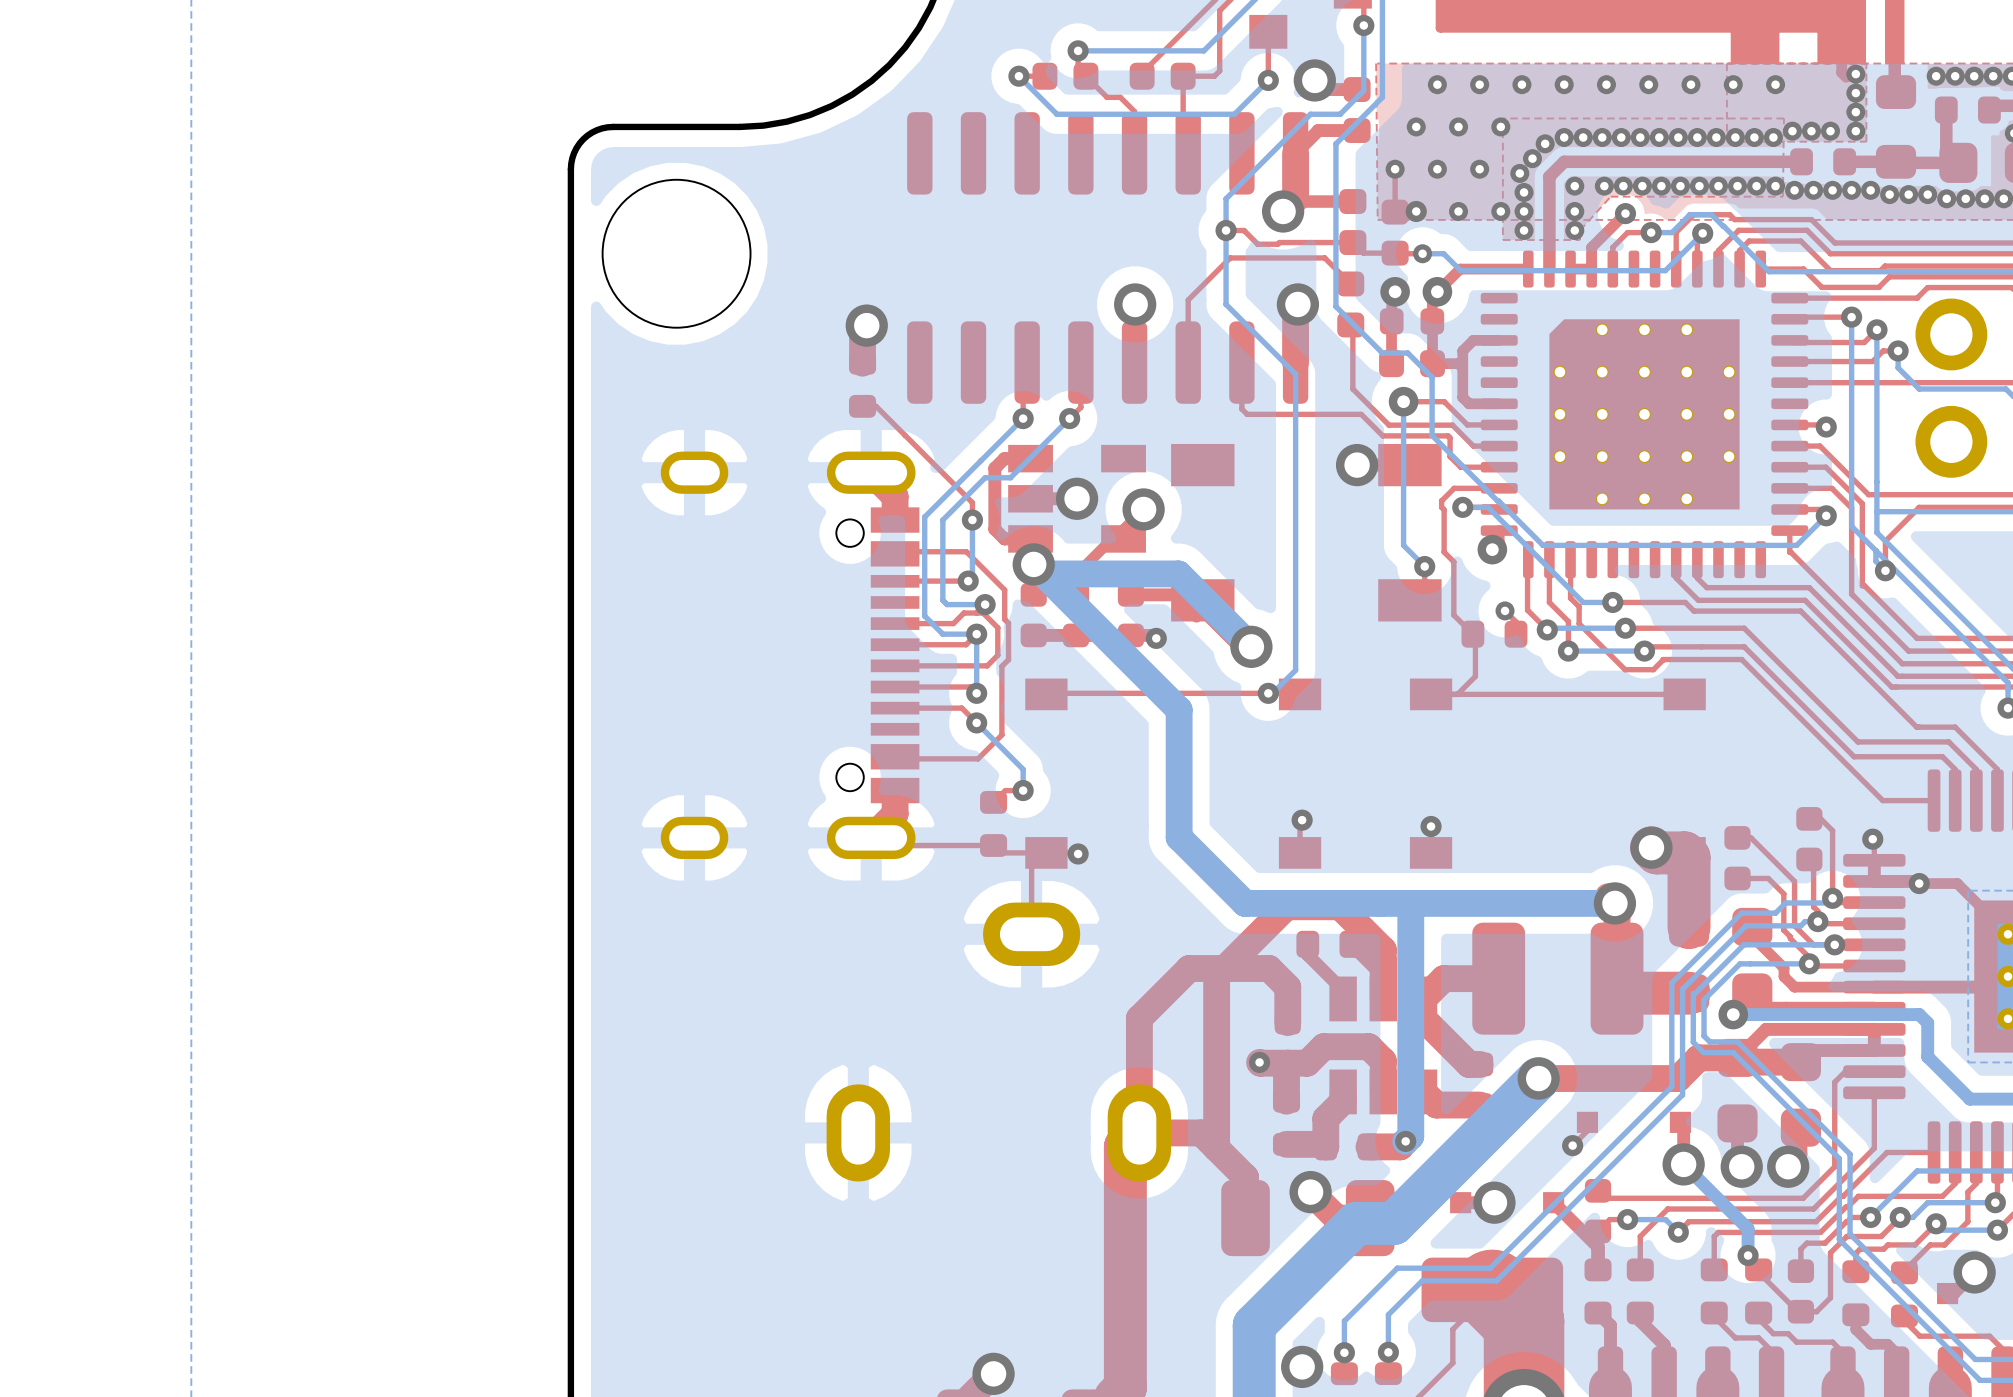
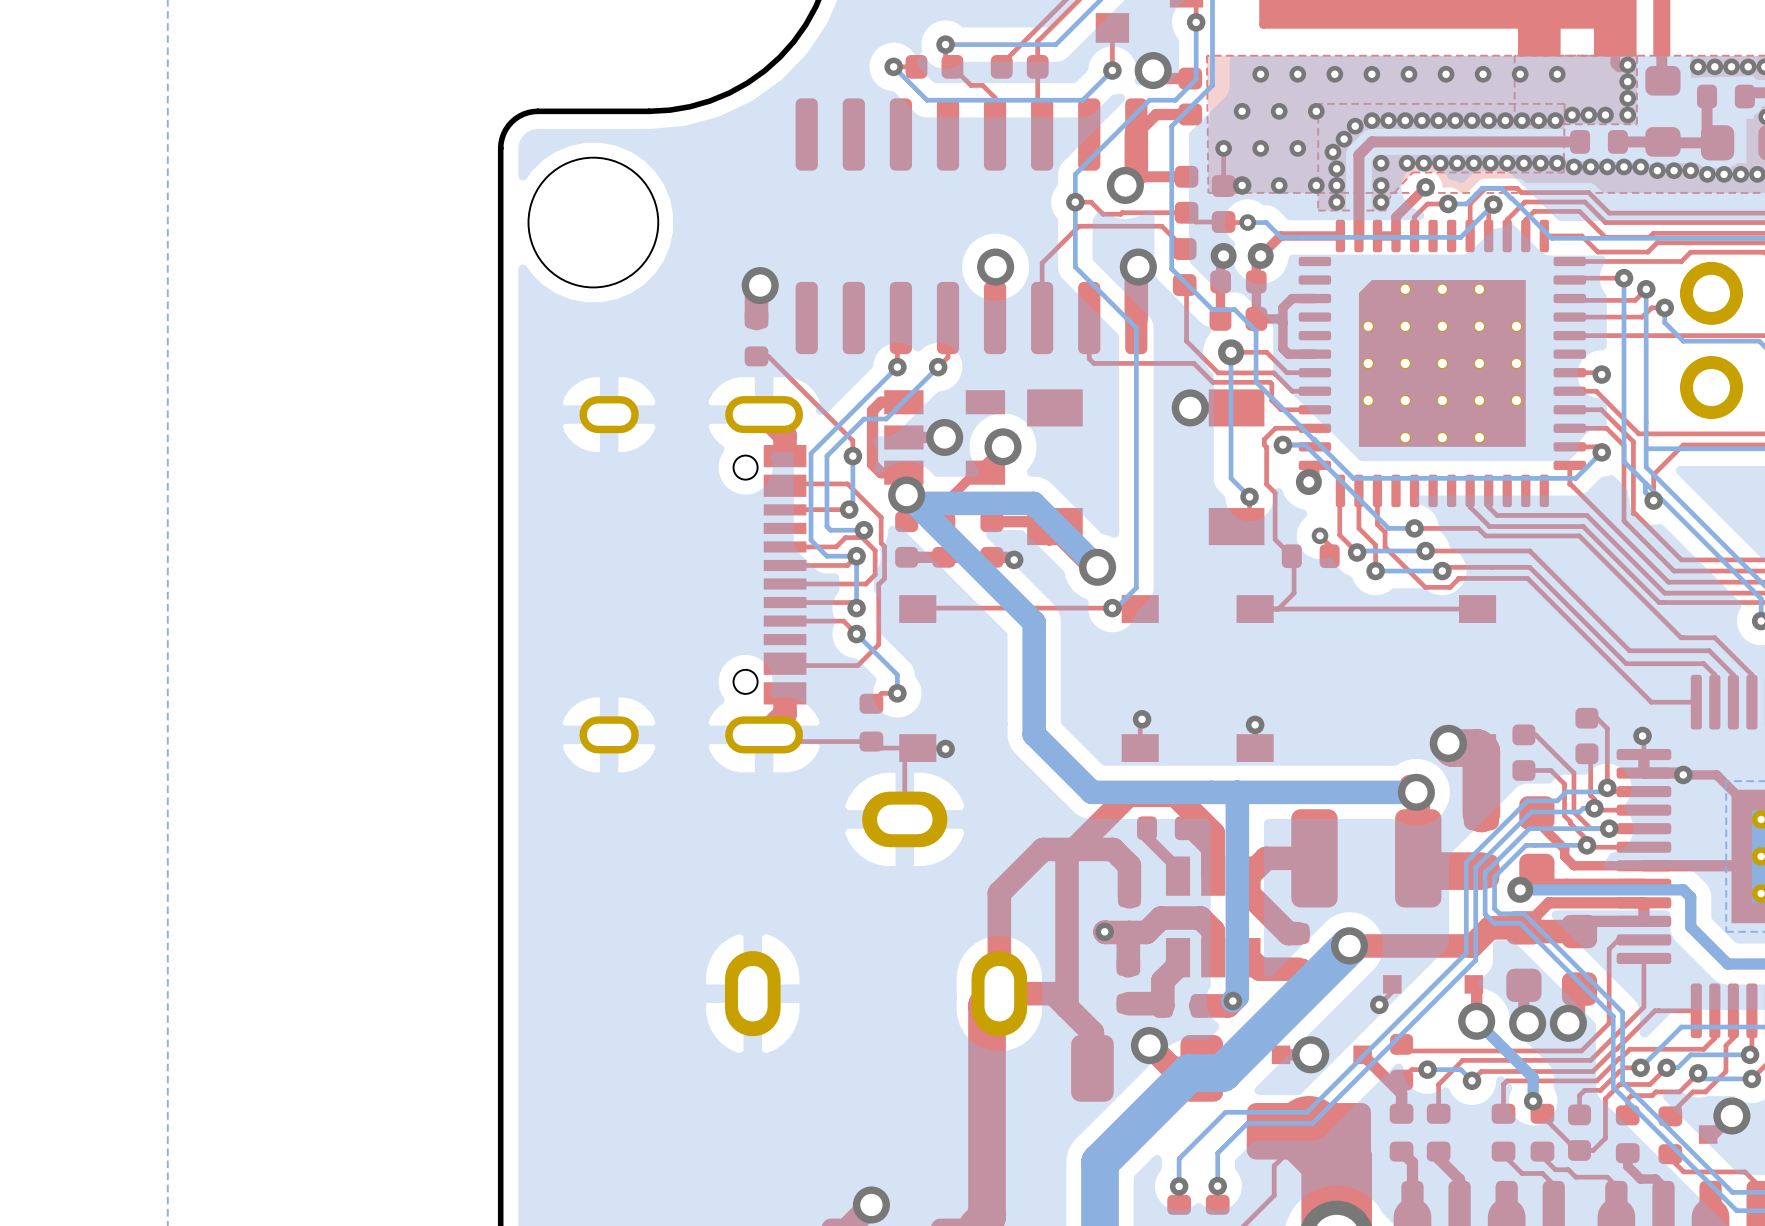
top track: (1219, 10) (1219, 70) (1214, 76) (1183, 76) -> (1069, 9) (1037, 41) (1037, 66)
via: (1302, 1366) -> none

